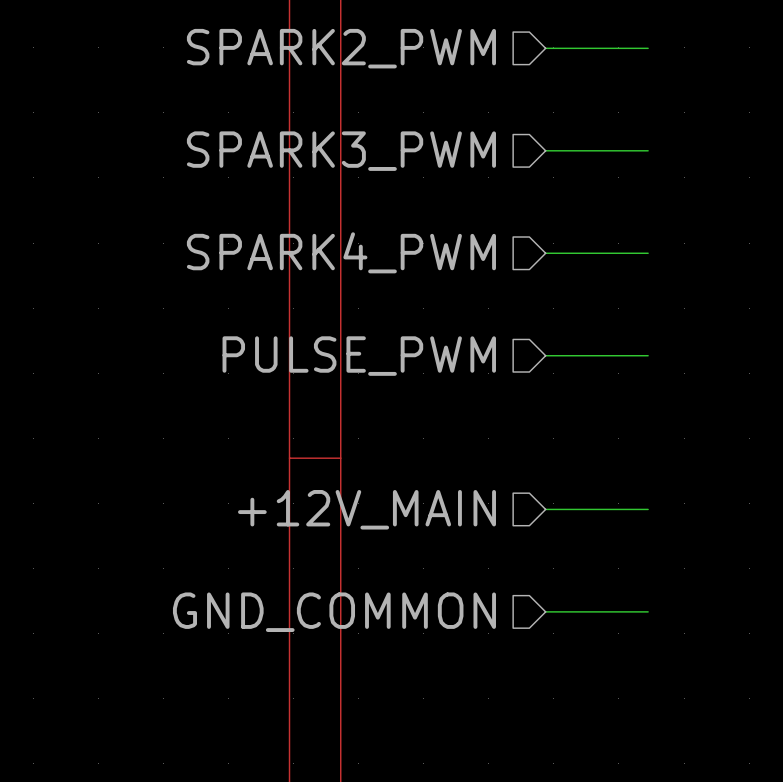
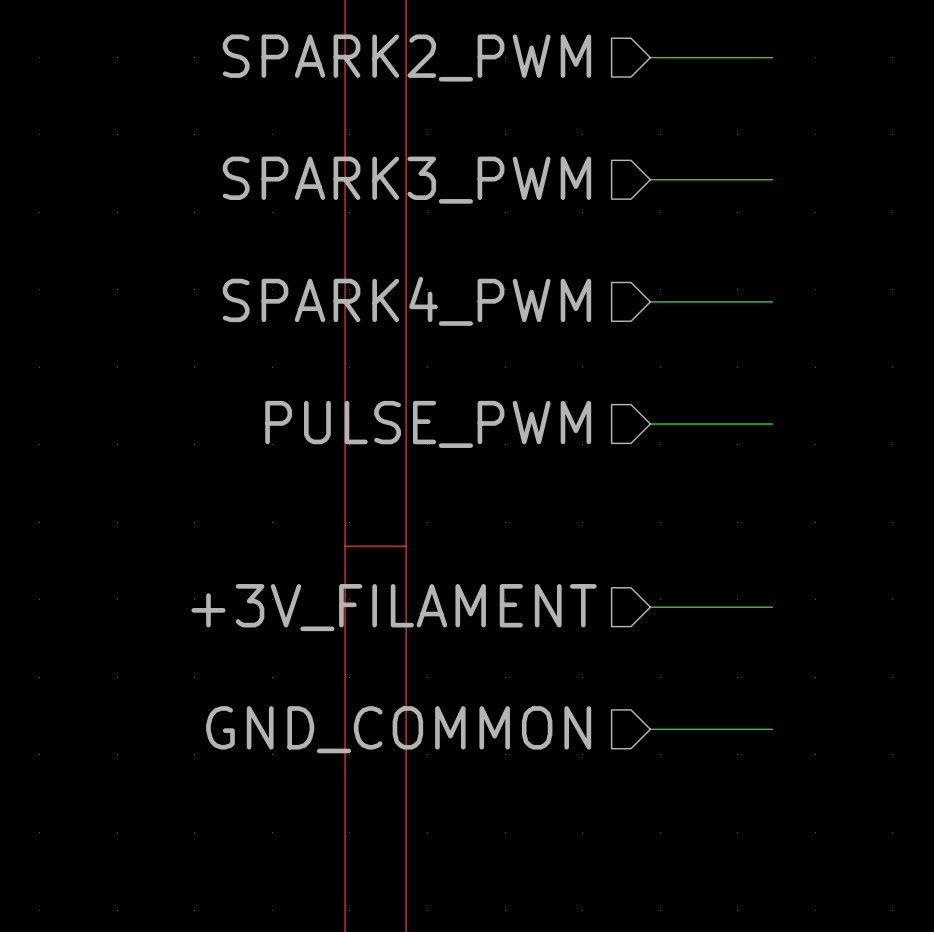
hierarchical label: +12V_MAIN (367, 509) -> +3V_FILAMENT (394, 607)

